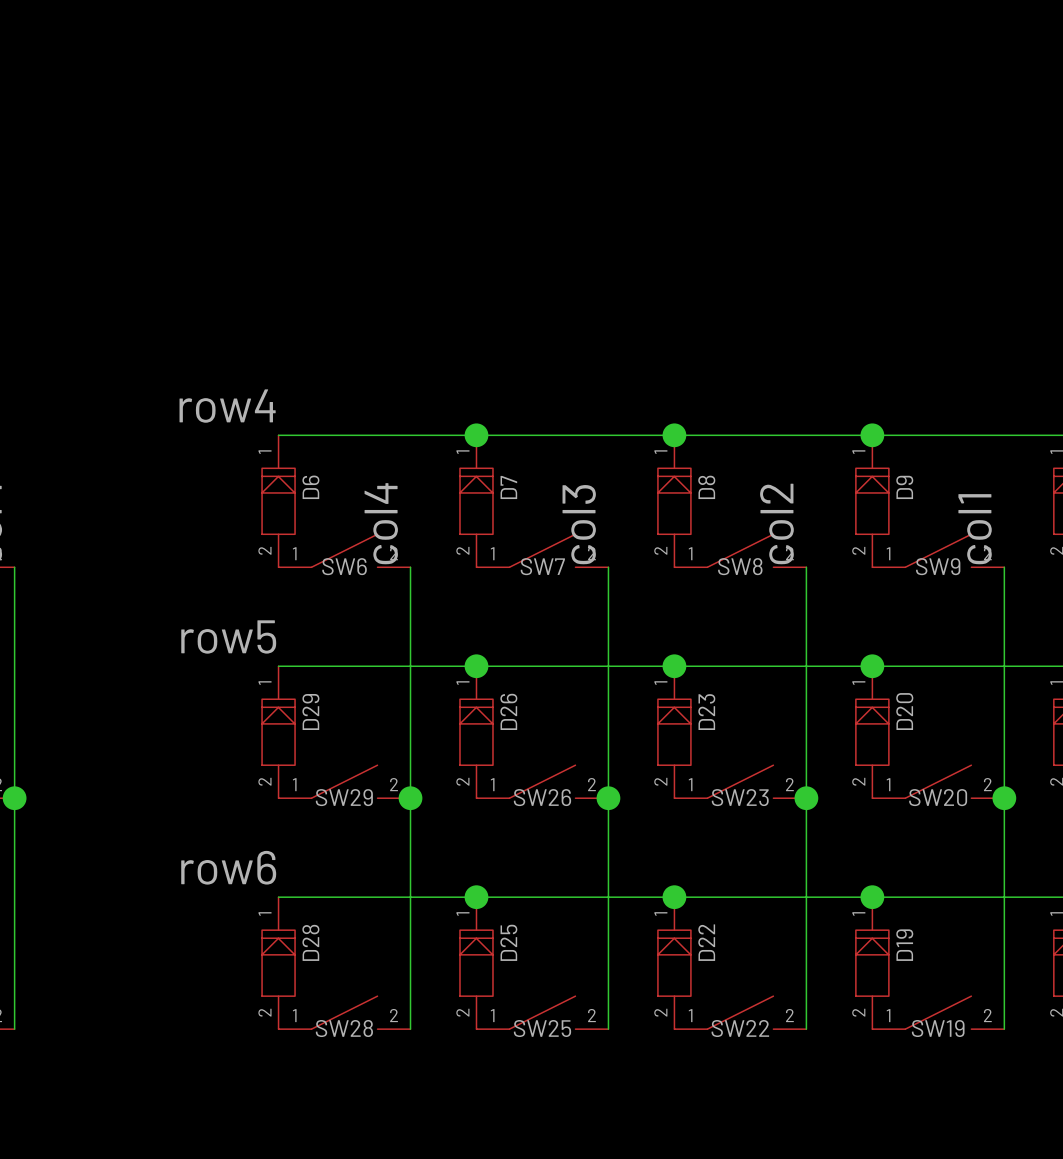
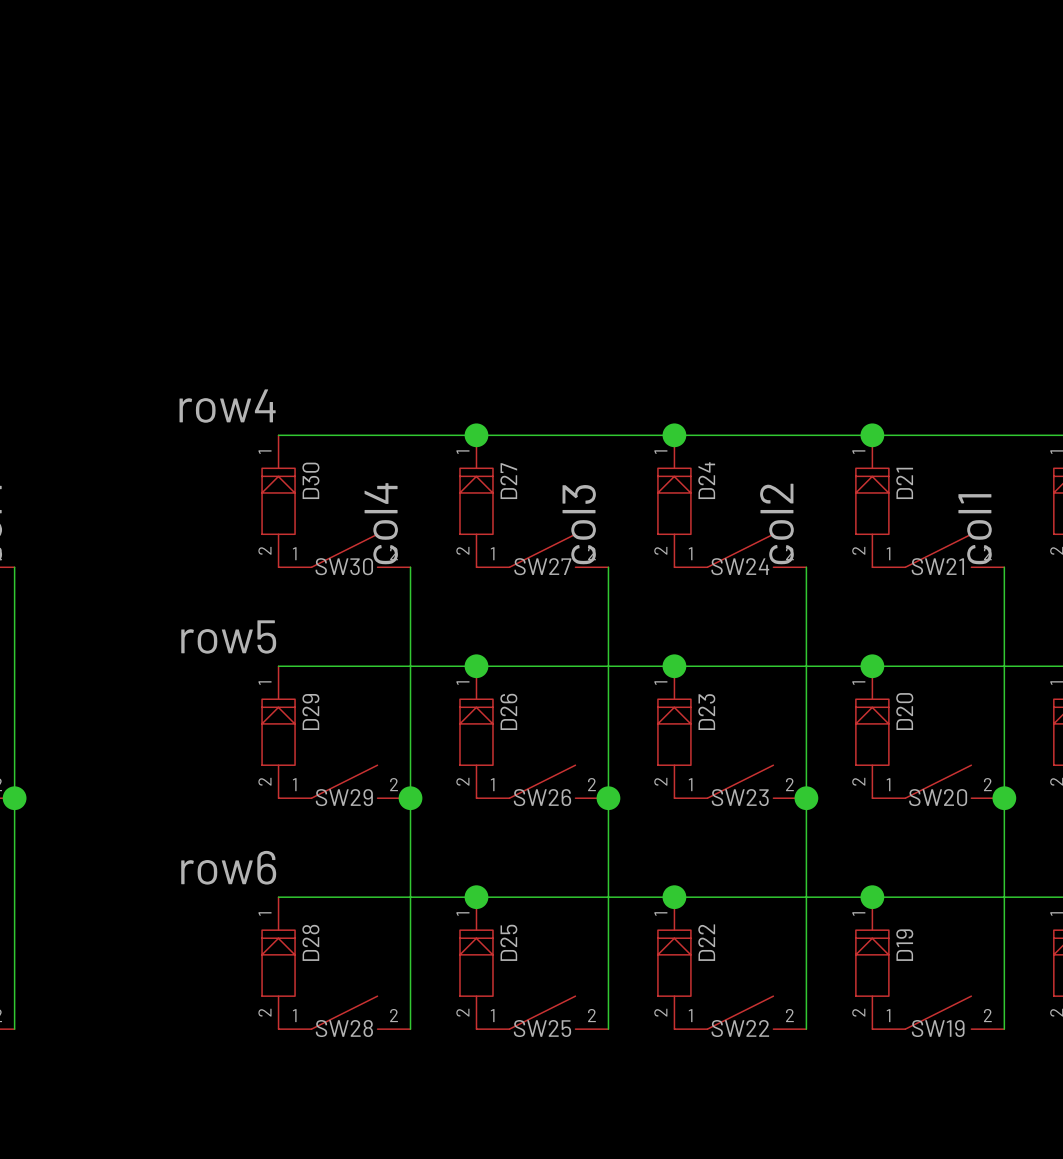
D6 name: D6 (310, 487) -> D30 (310, 480)
D7 name: D7 (508, 487) -> D27 (508, 481)
D8 name: D8 (706, 487) -> D24 (706, 480)
D9 name: D9 (904, 487) -> D21 (904, 483)
SW6 name: SW6 (344, 566) -> SW30 (344, 566)
SW7 name: SW7 (542, 566) -> SW27 (542, 566)
SW8 name: SW8 (740, 566) -> SW24 (740, 566)
SW9 name: SW9 (938, 566) -> SW21 (937, 566)

